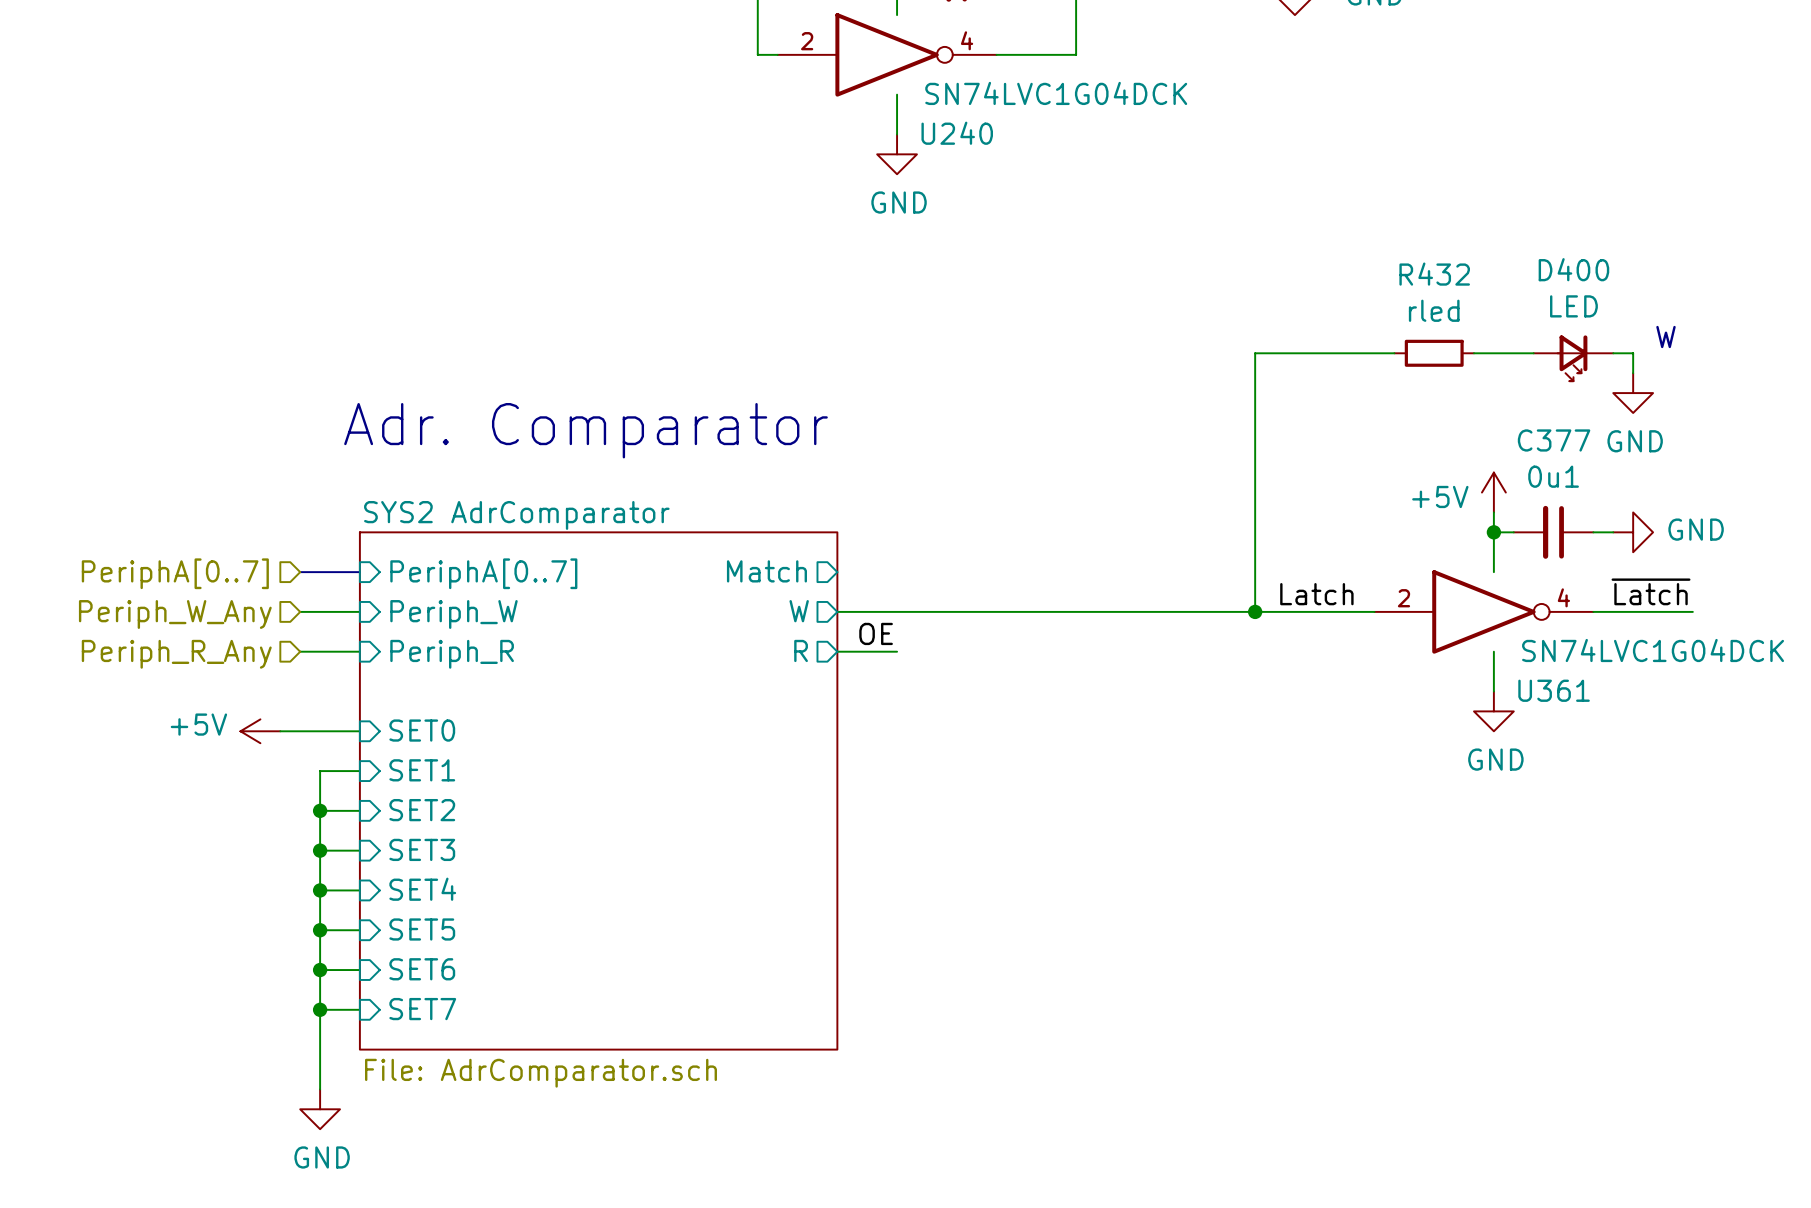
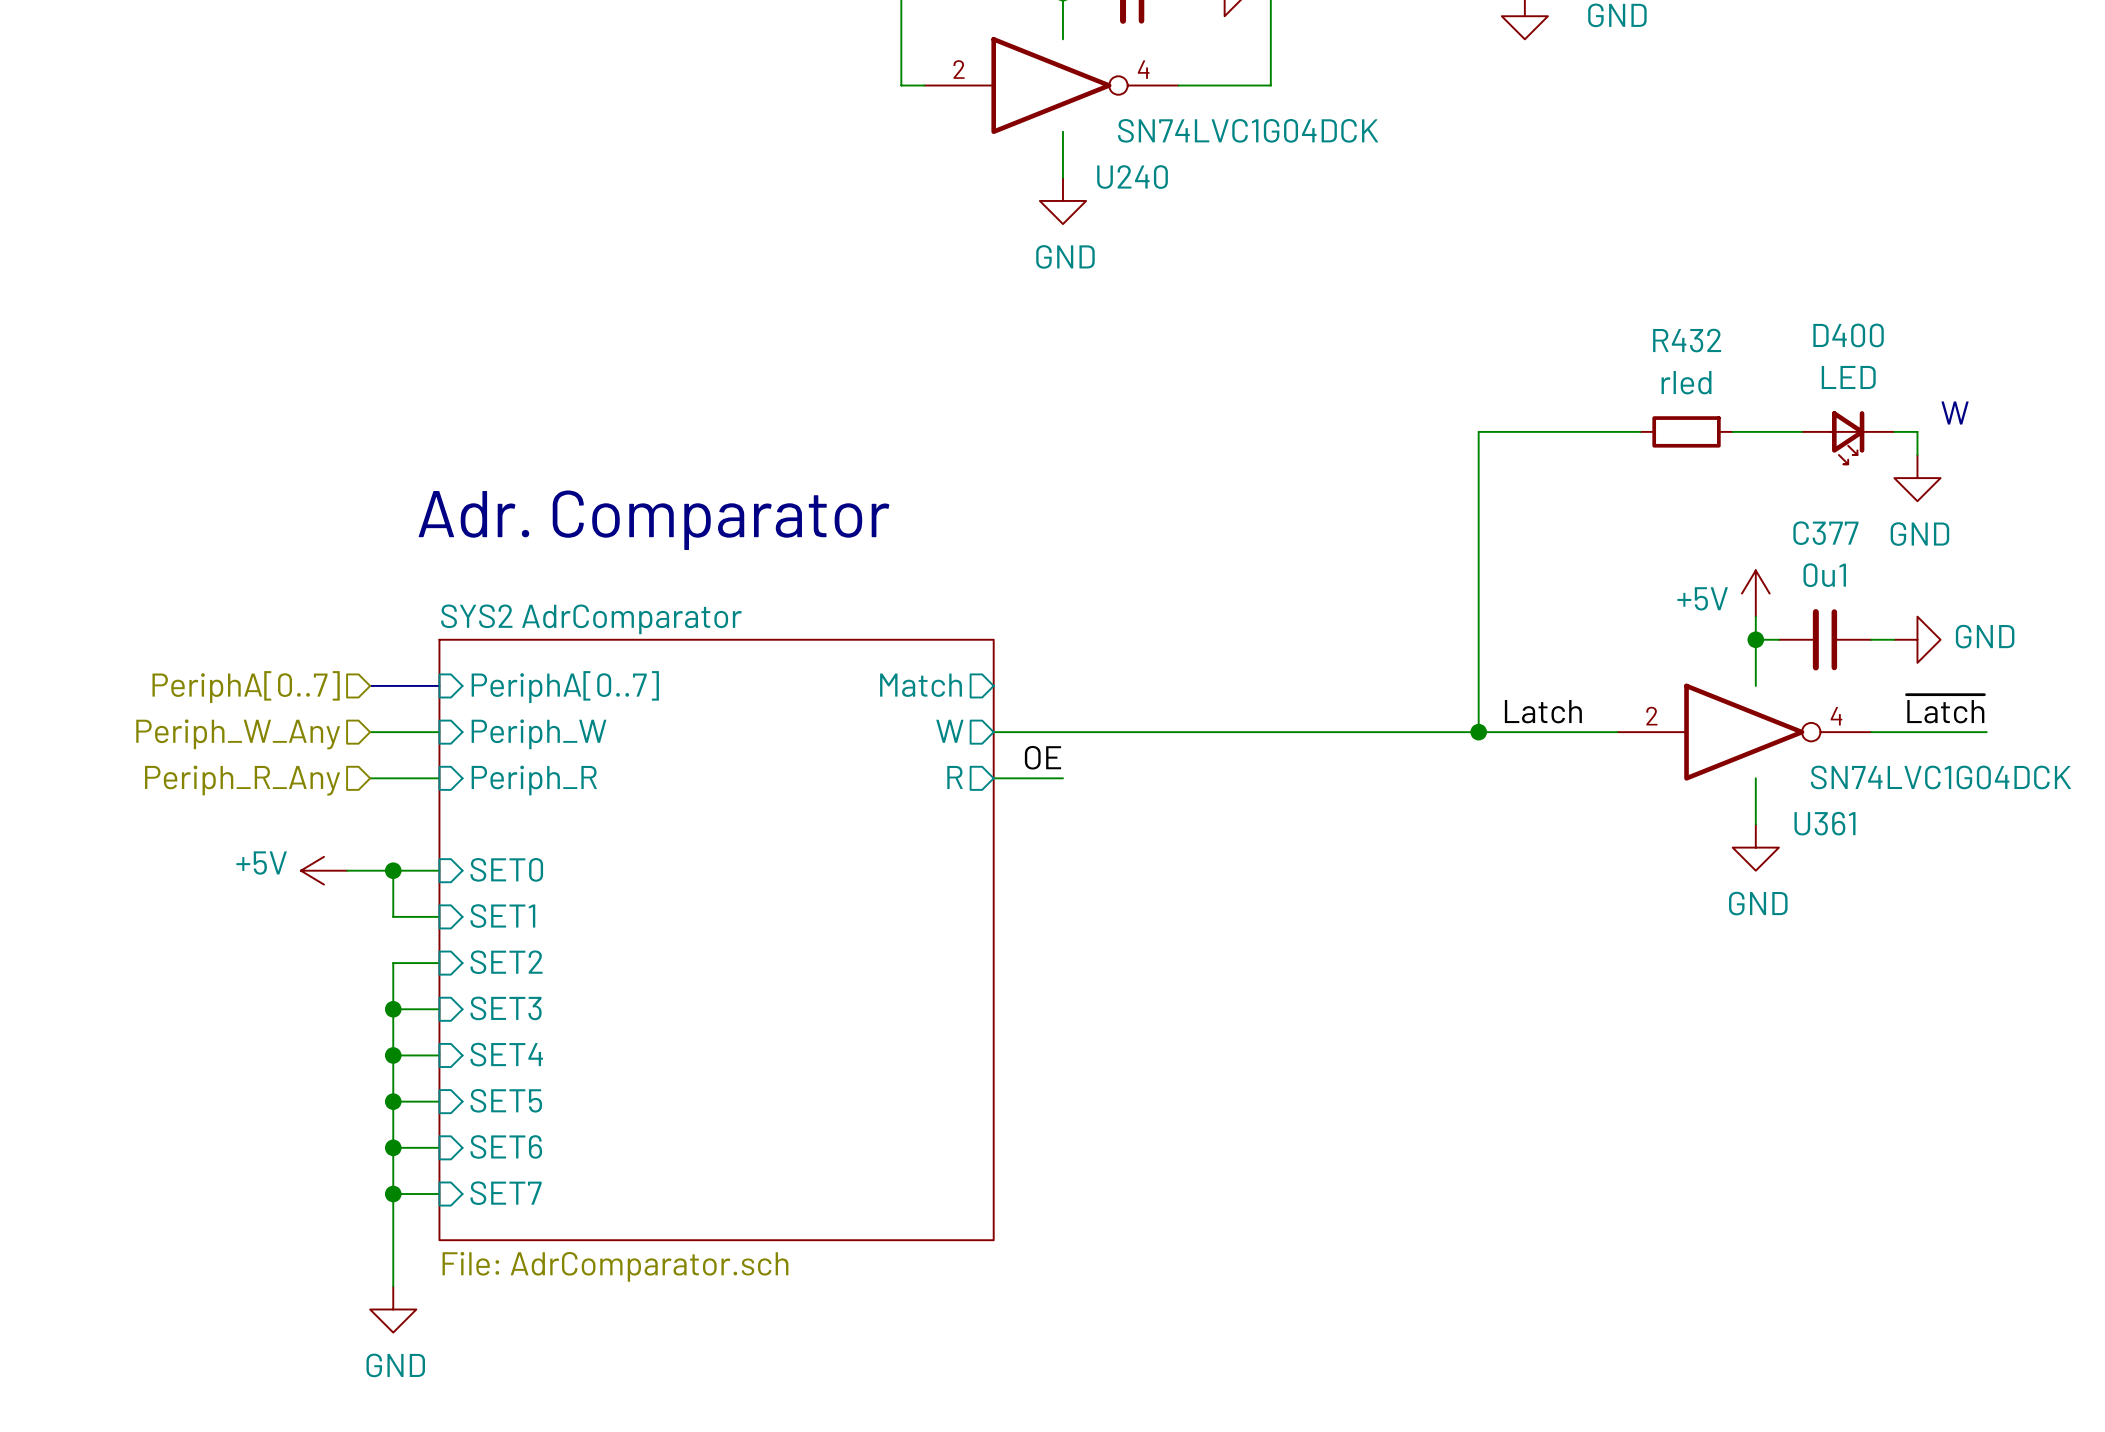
wire: (320, 771) (320, 810) -> (393, 916) (393, 870)
junction position: (320, 810) -> (393, 870)

